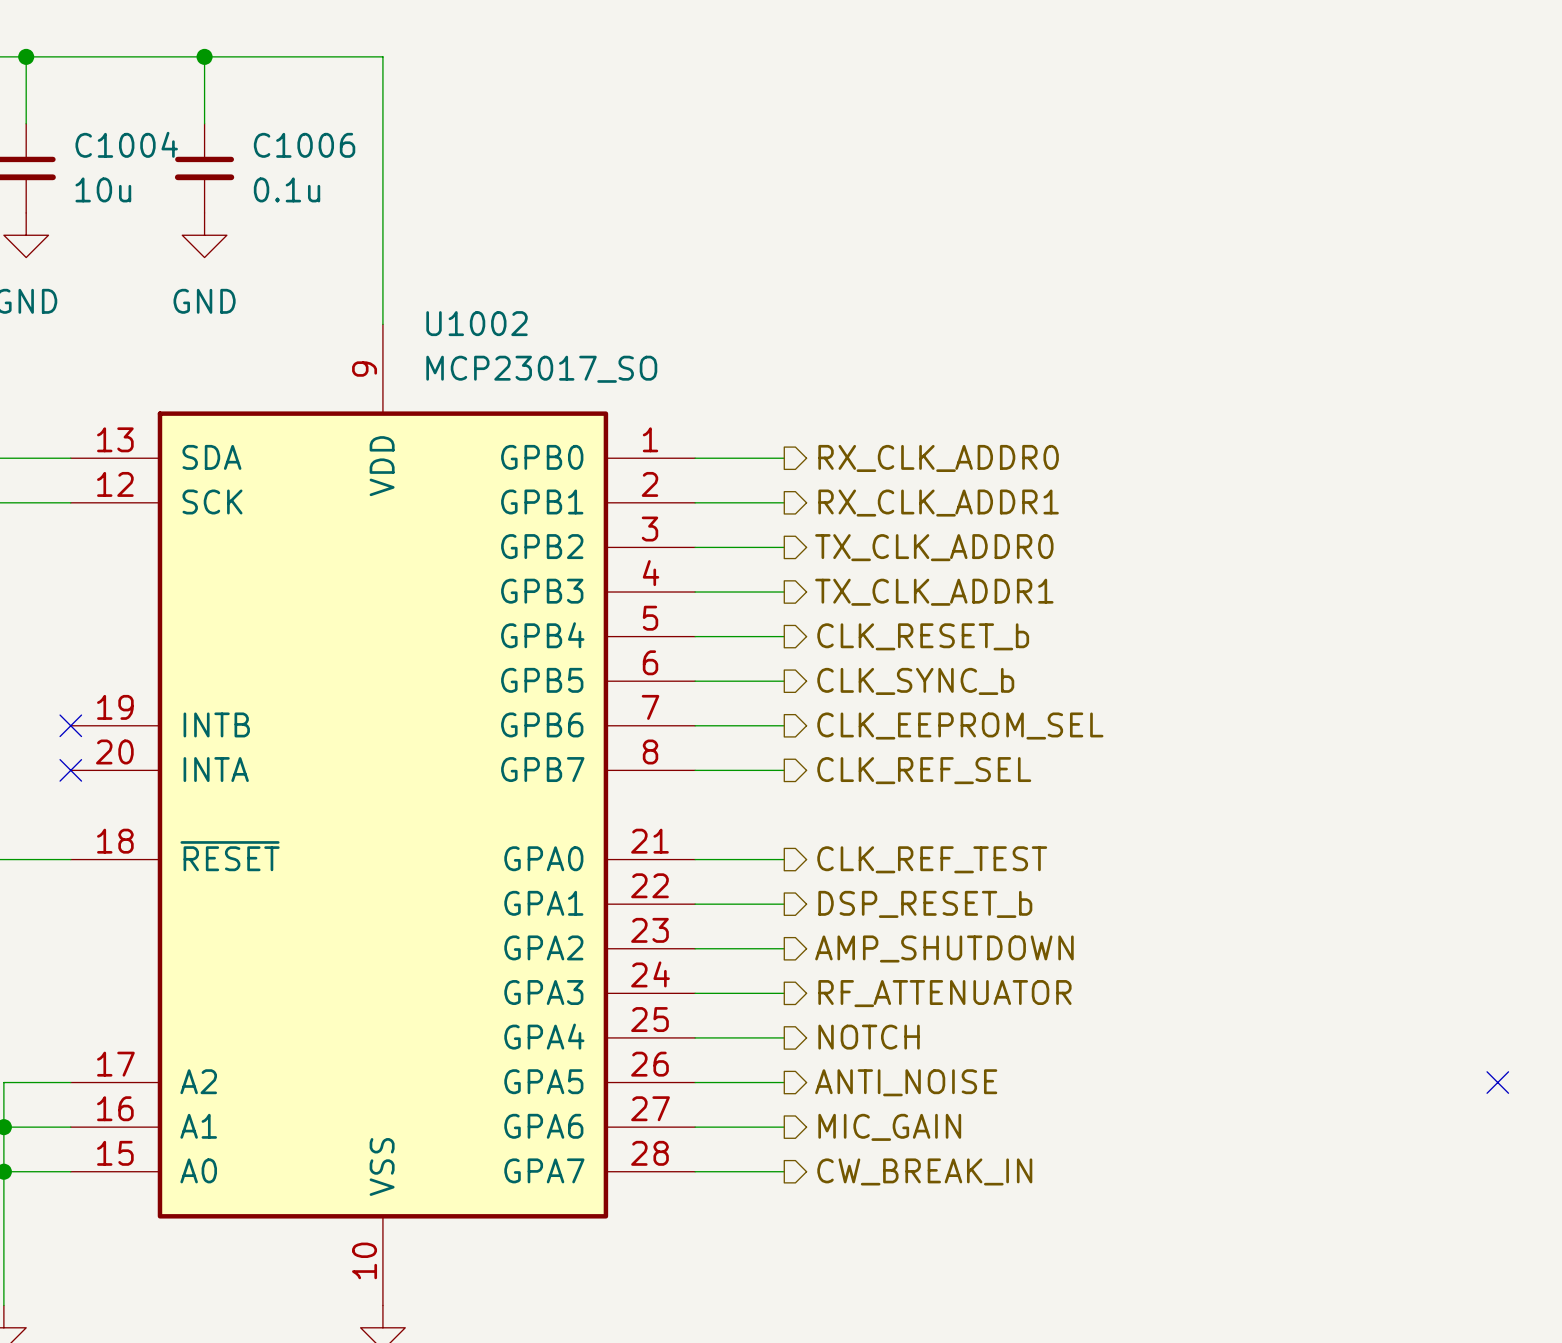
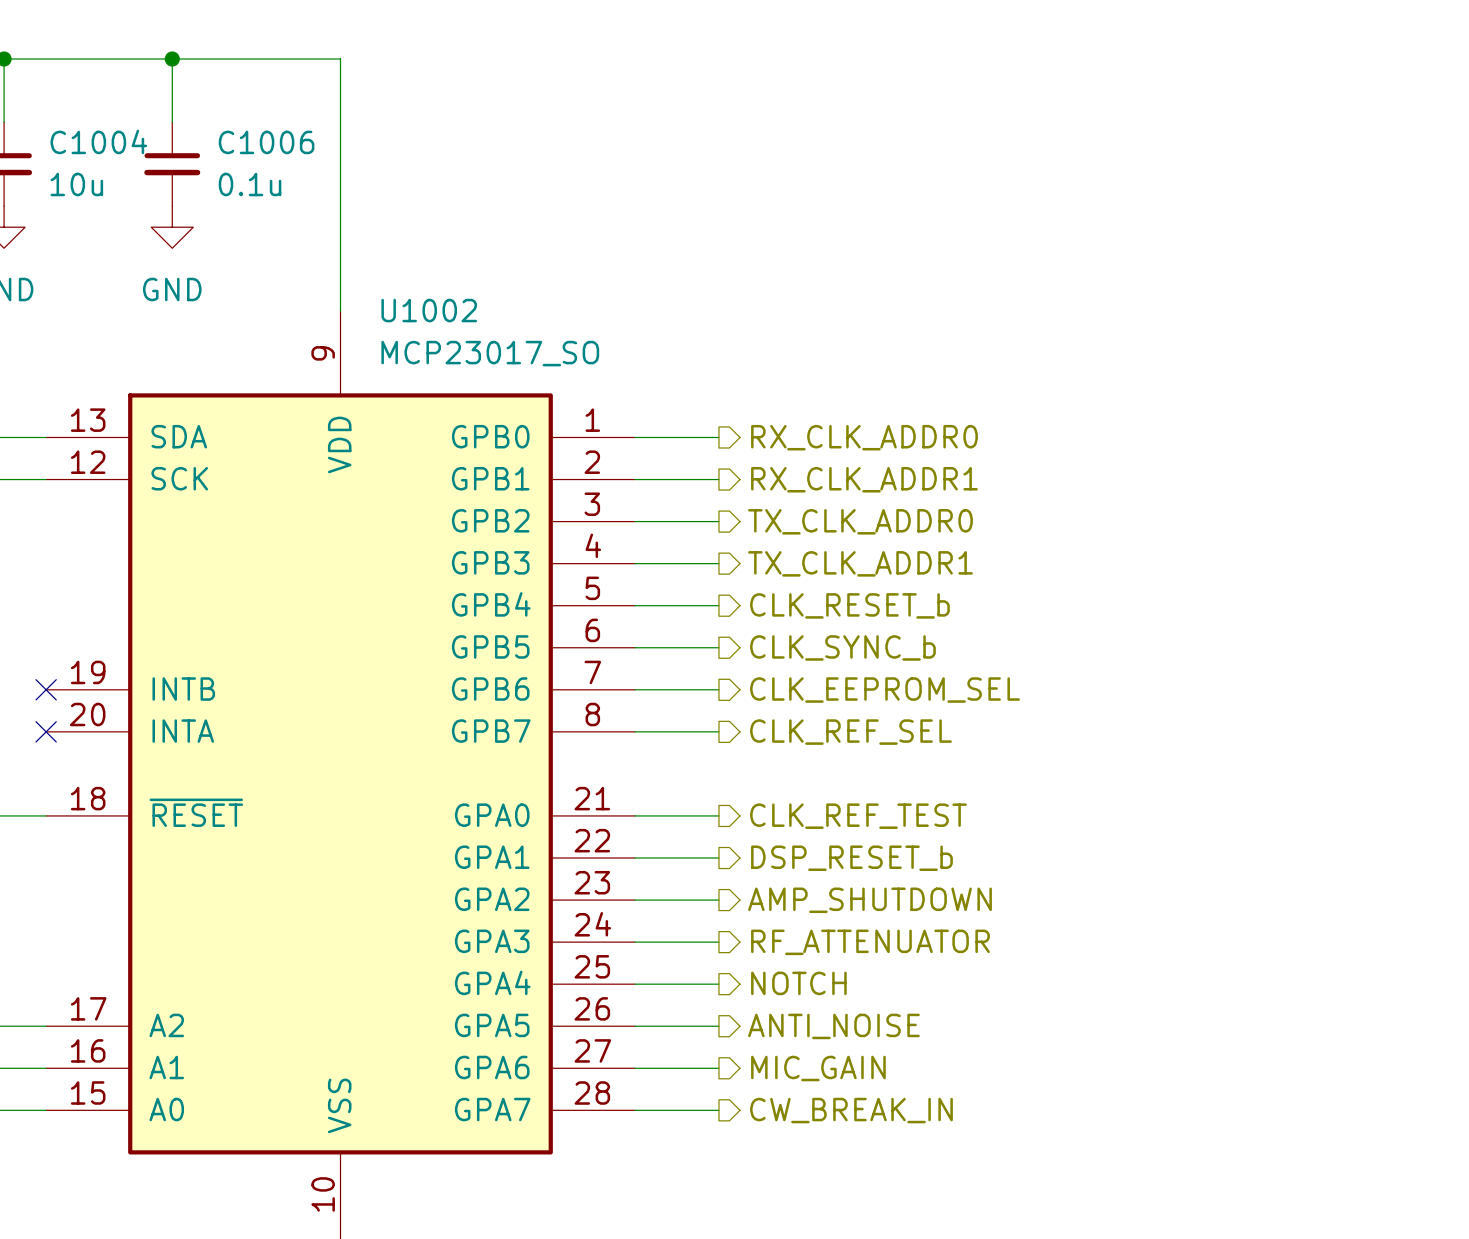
no-connect mark: (1497, 1082) -> none

